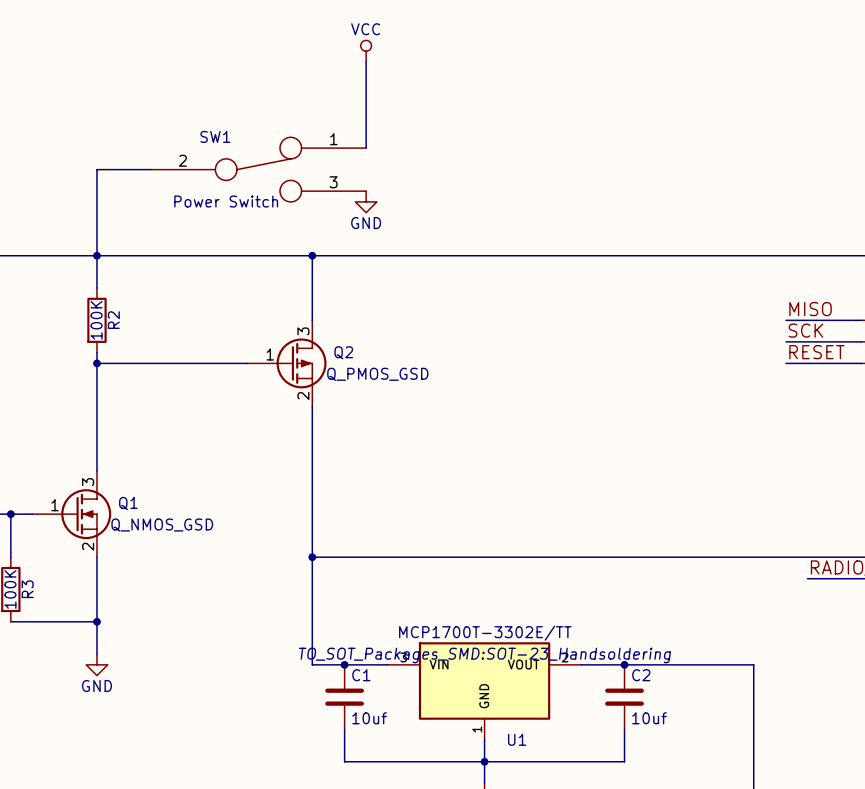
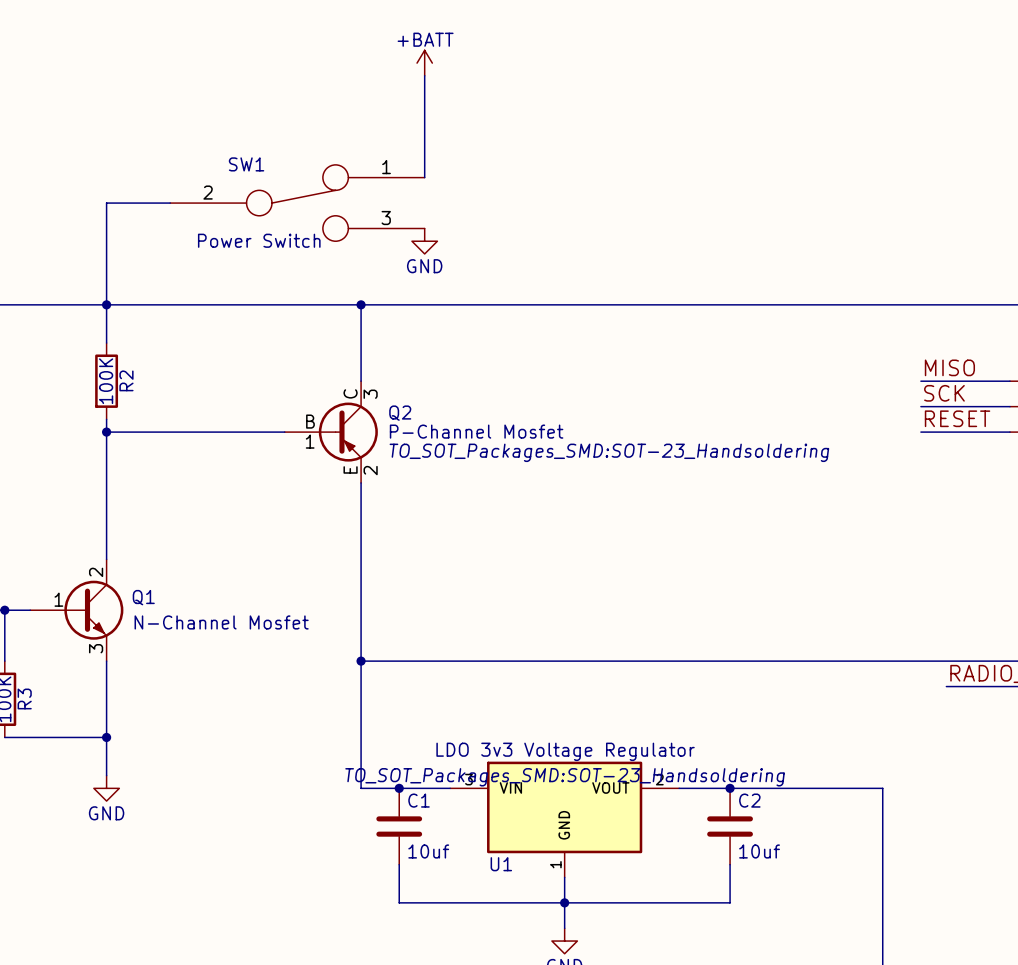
power symbol: VCC (366, 51) -> +BATT (424, 63)
Q2 symbol: [247, 320, 327, 407] -> [284, 381, 378, 483]
Q2 value: Q_PMOS_GSD (377, 374) -> P-Channel Mosfet (476, 431)
Q2 text: none -> TO_SOT_Packages_SMD:SOT-23_Handsoldering (609, 452)
Q1 symbol: [32, 471, 112, 558] -> [30, 559, 124, 662]
Q1 value: Q_NMOS_GSD (162, 525) -> N-Channel Mosfet (221, 622)
U1 value: MCP1700T-3302E/TT (485, 633) -> LDO 3v3 Voltage Regulator (565, 751)
U1 name position: U1 (517, 739) -> U1 (501, 864)

